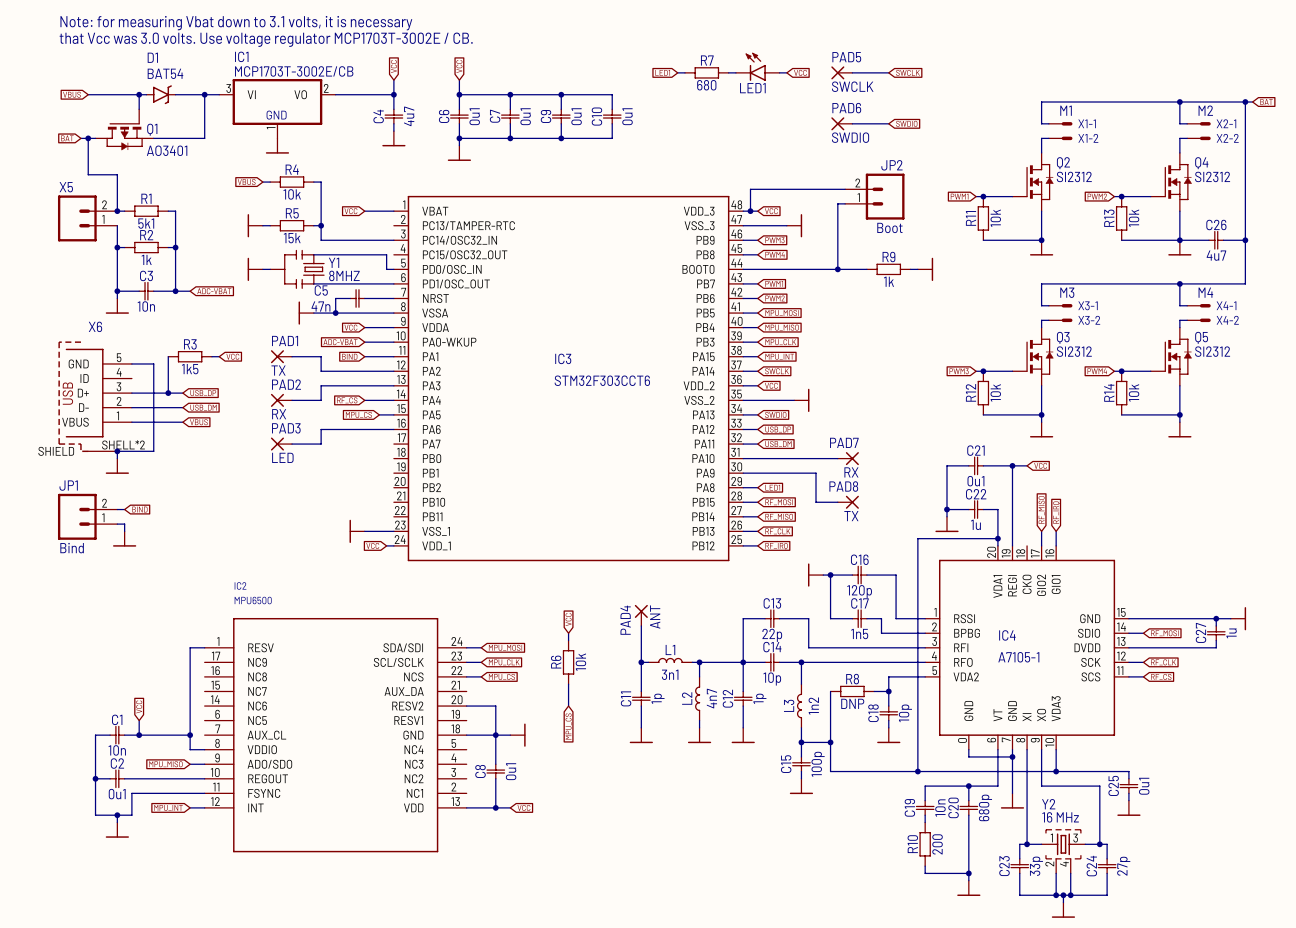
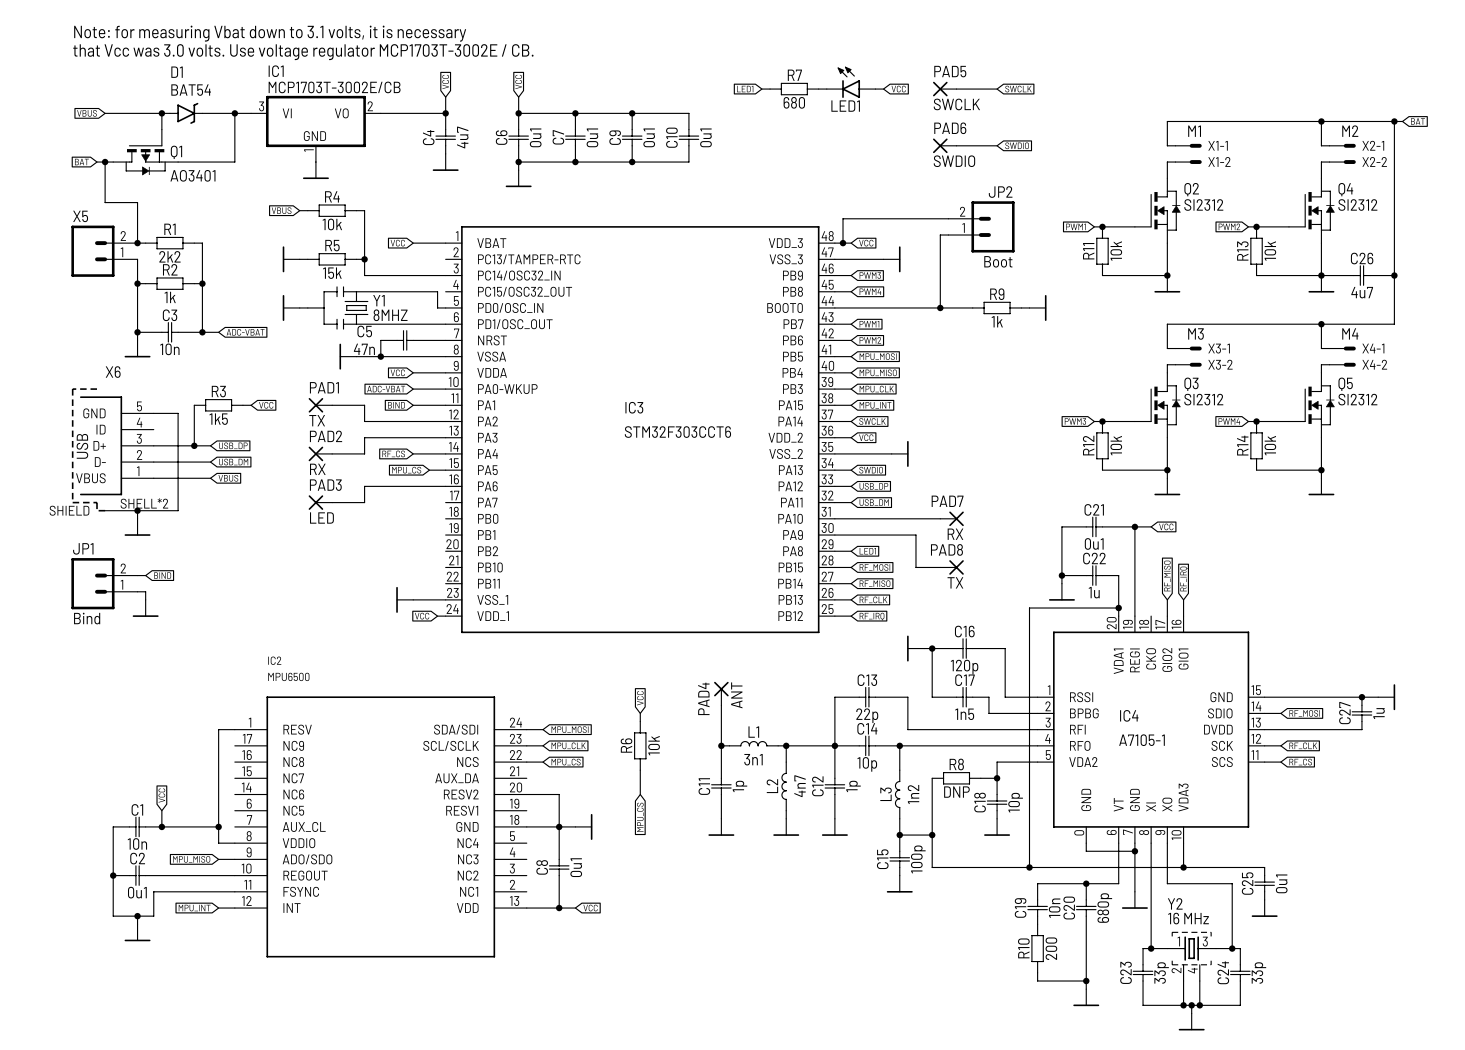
R1 value: 5k1 (146, 223) -> 2k2 (169, 256)
C24 value: 27p (1123, 866) -> 33p (1258, 973)

